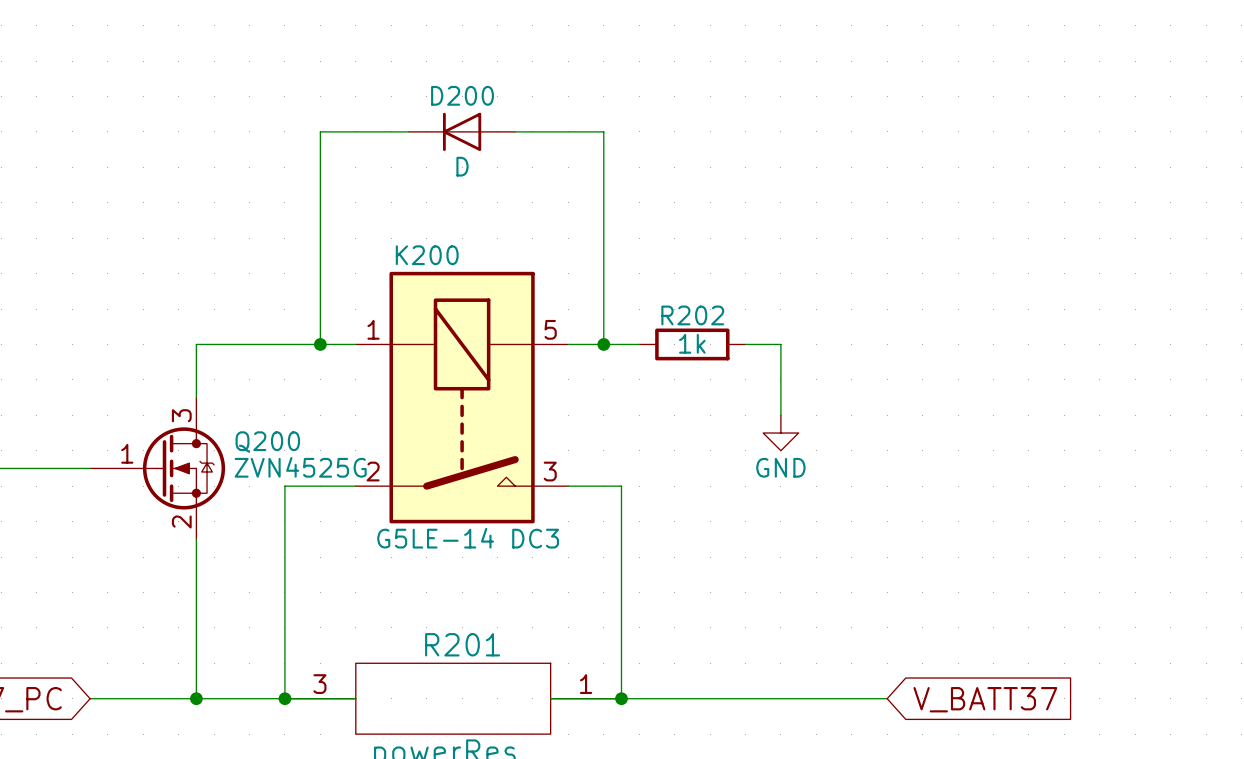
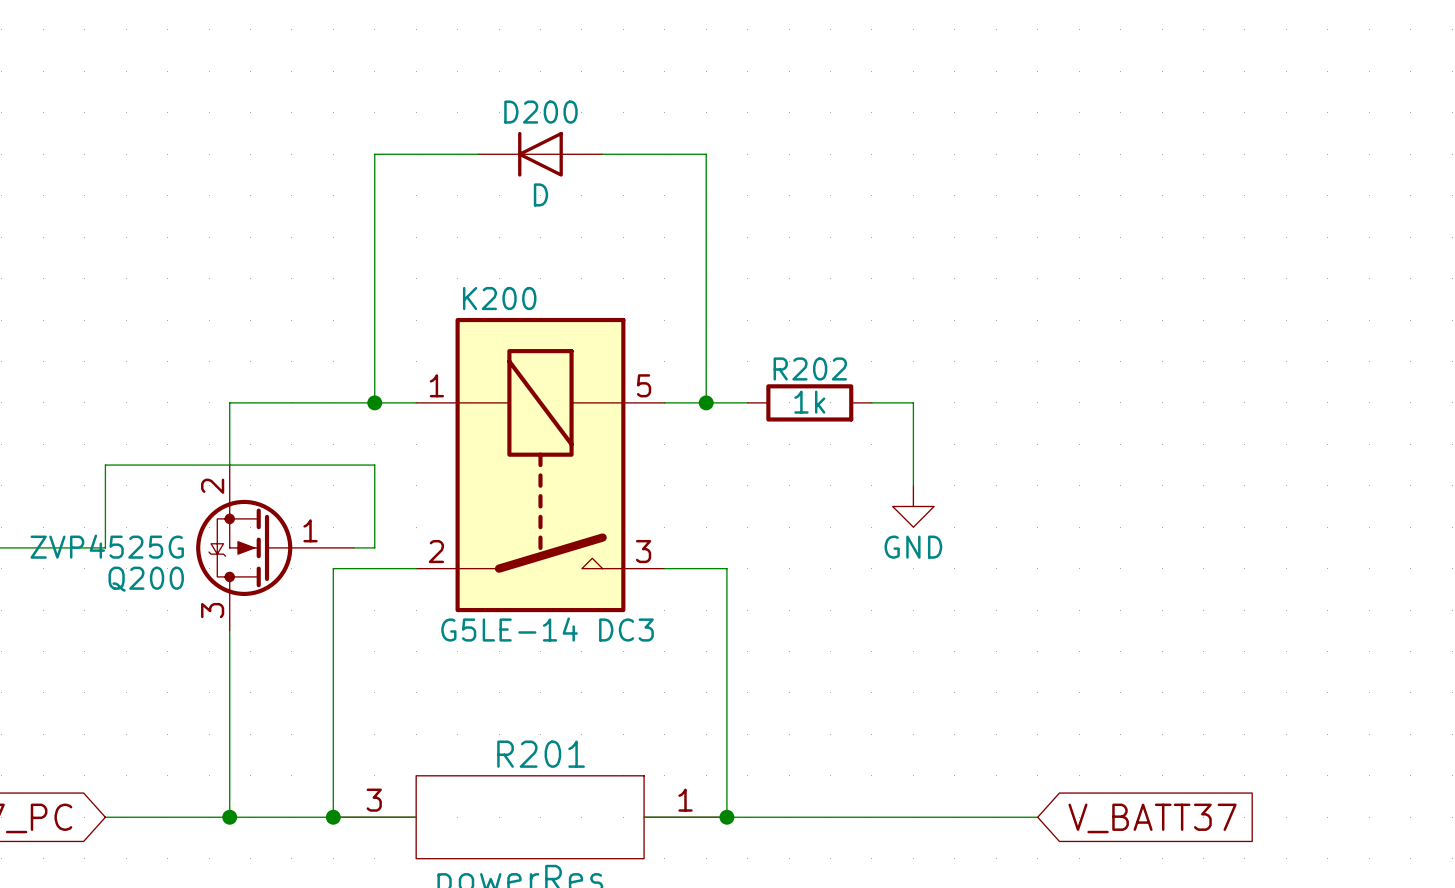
Q200 value: ZVN4525G (300, 467) -> ZVP4525G (107, 546)
wire: none -> (105, 547) (105, 465) (374, 465) (374, 547) (354, 547)
Q200 rotation: 0° (183, 468) -> 180° (244, 547)

